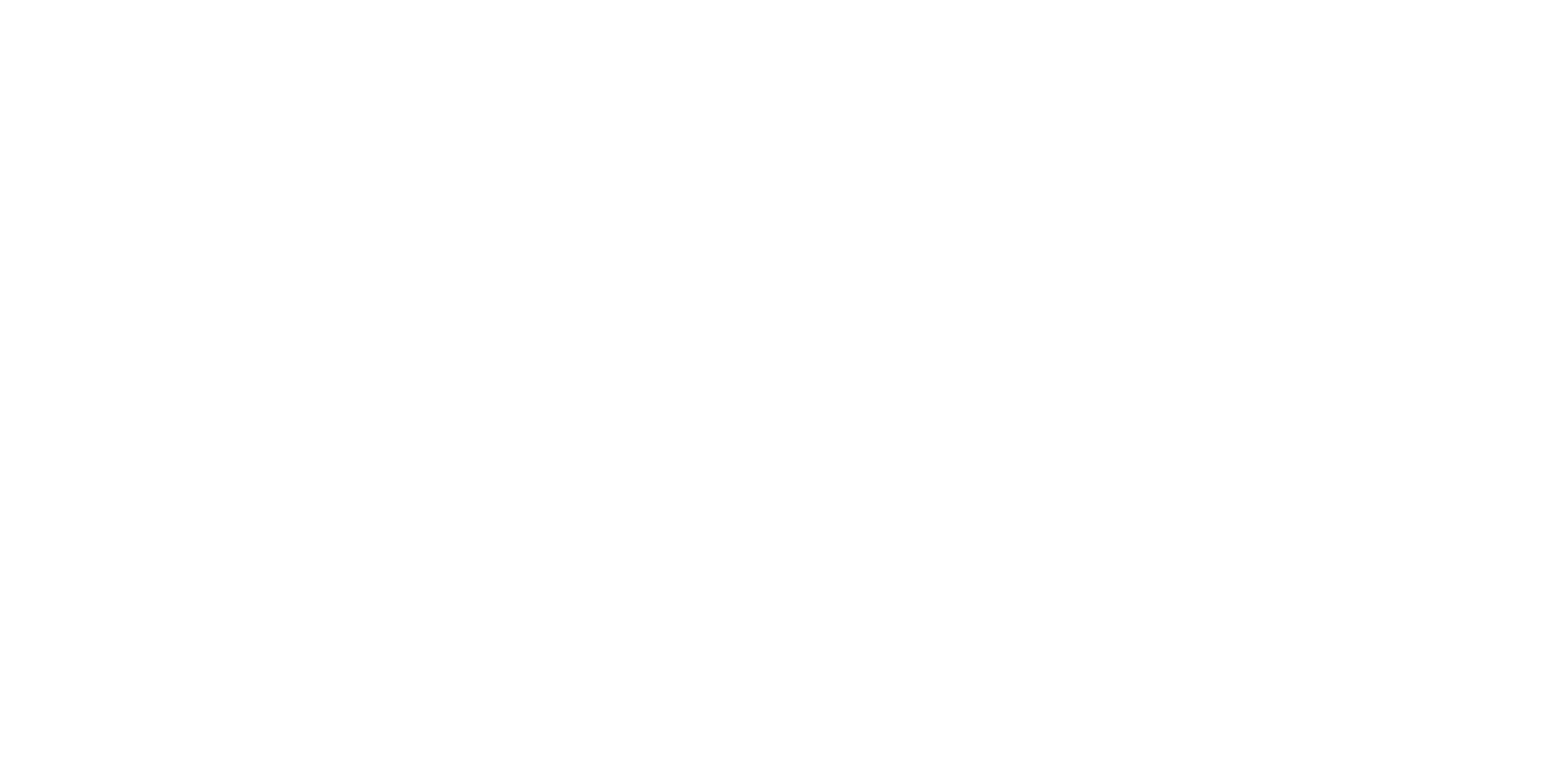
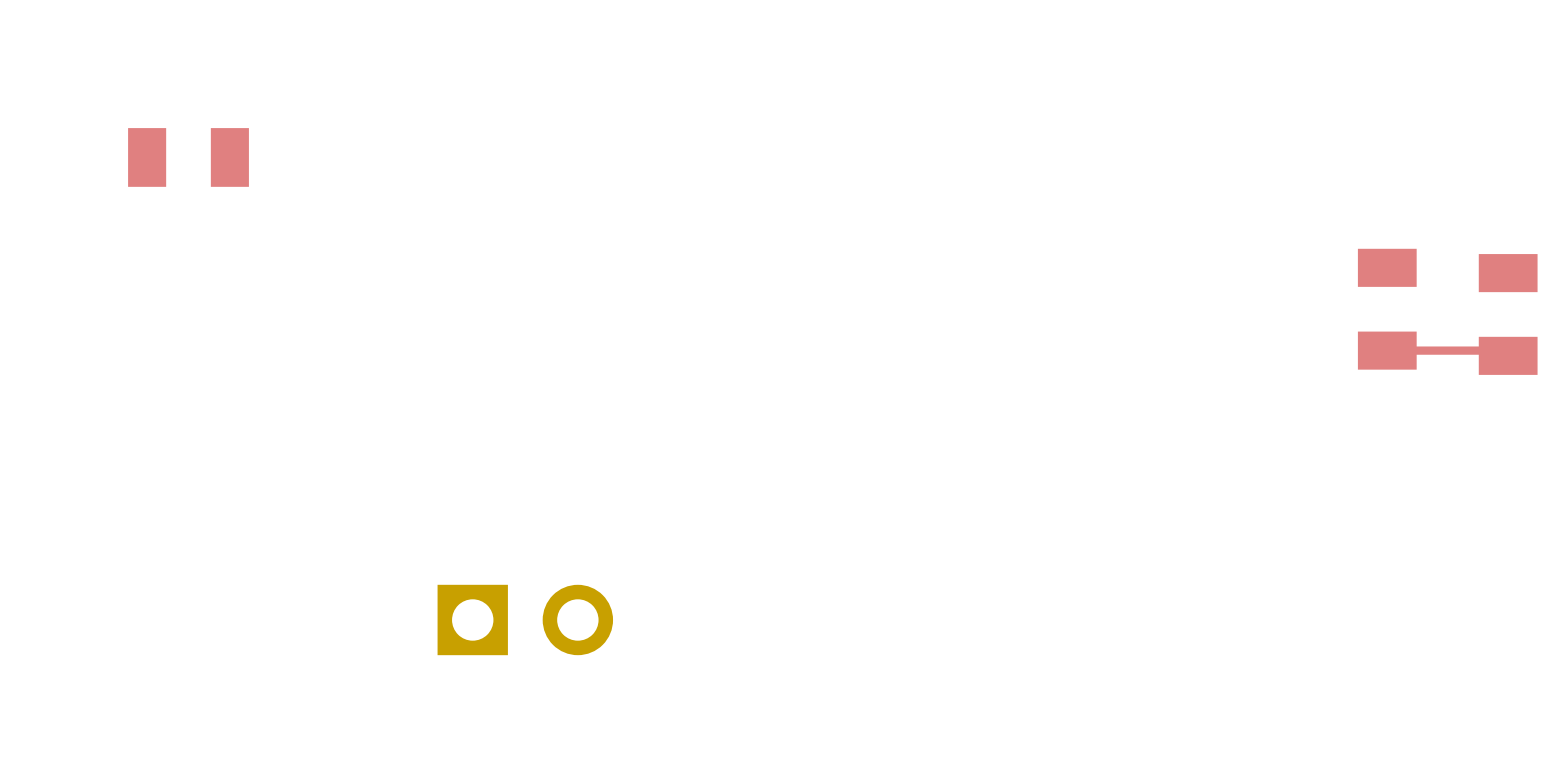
part: none -> (188, 157)
part: none -> (1387, 309)
part: none -> (1508, 314)
top track: none -> (1387, 350) (1502, 350) (1508, 355)
part: none -> (525, 619)

